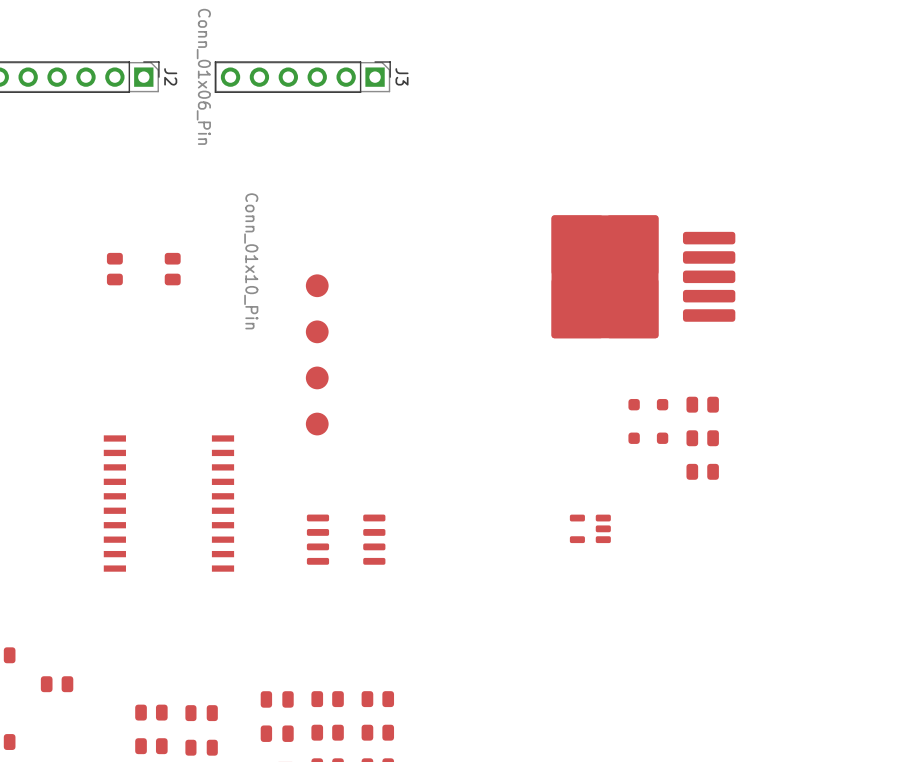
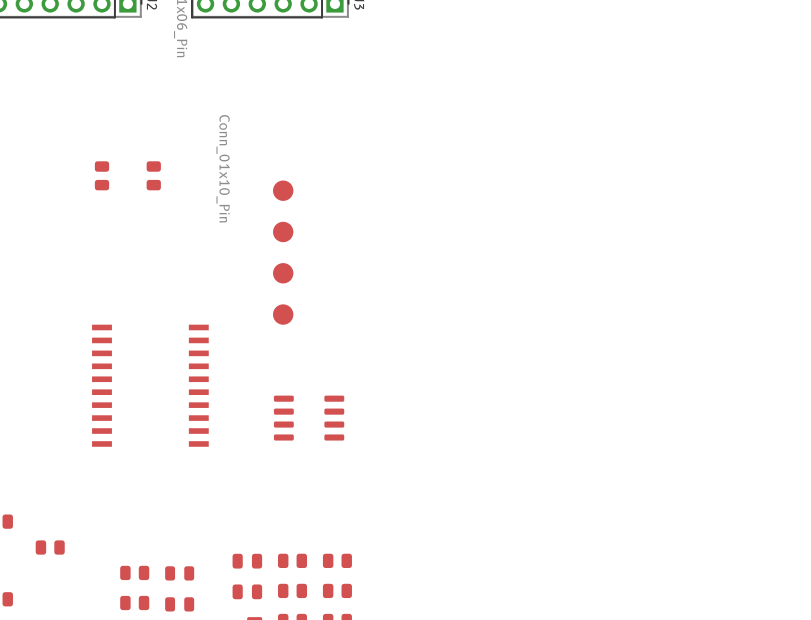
part: (643, 276) -> none
part: (648, 404) -> none
part: (702, 404) -> none
part: (648, 438) -> none
part: (702, 438) -> none
part: (702, 471) -> none
part: (590, 528) -> none

